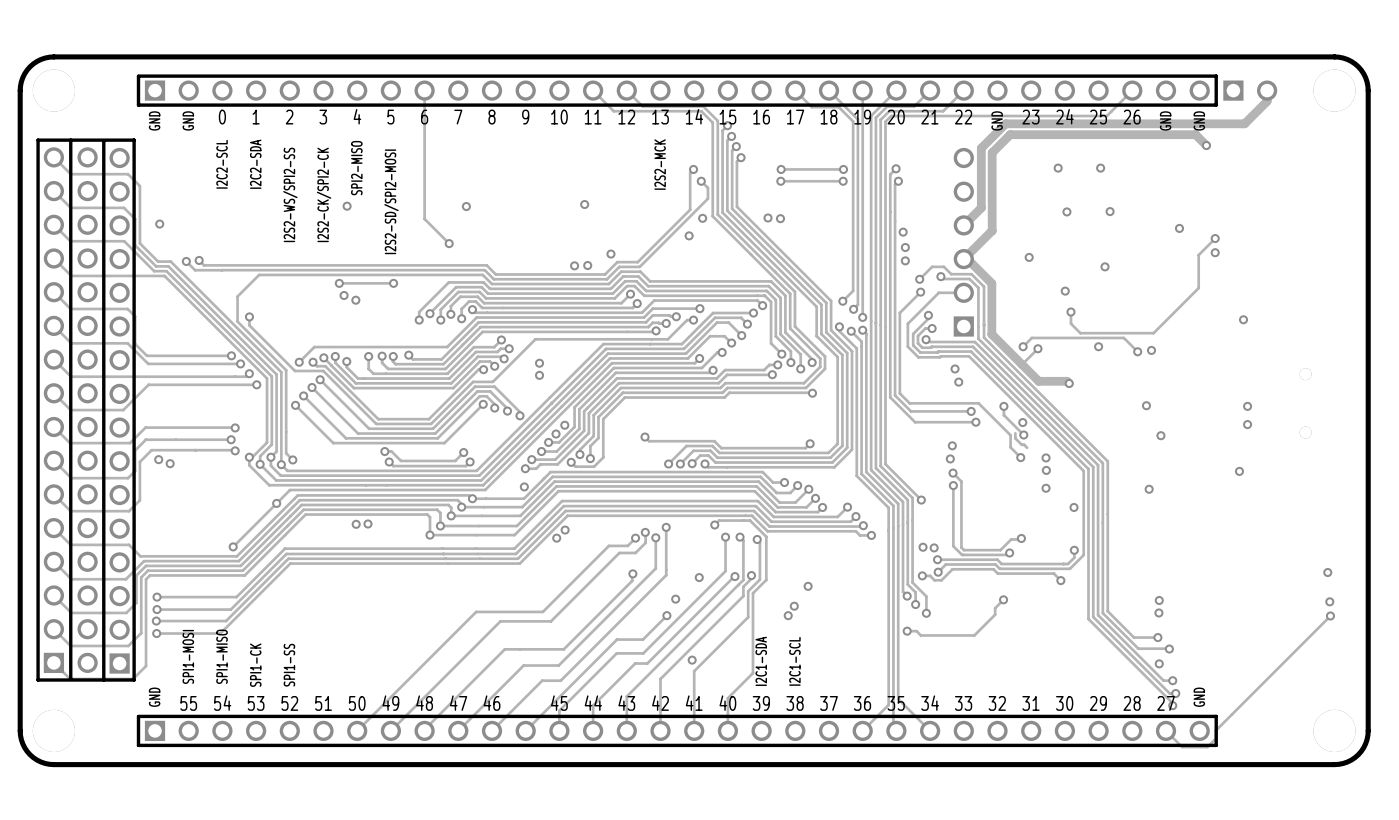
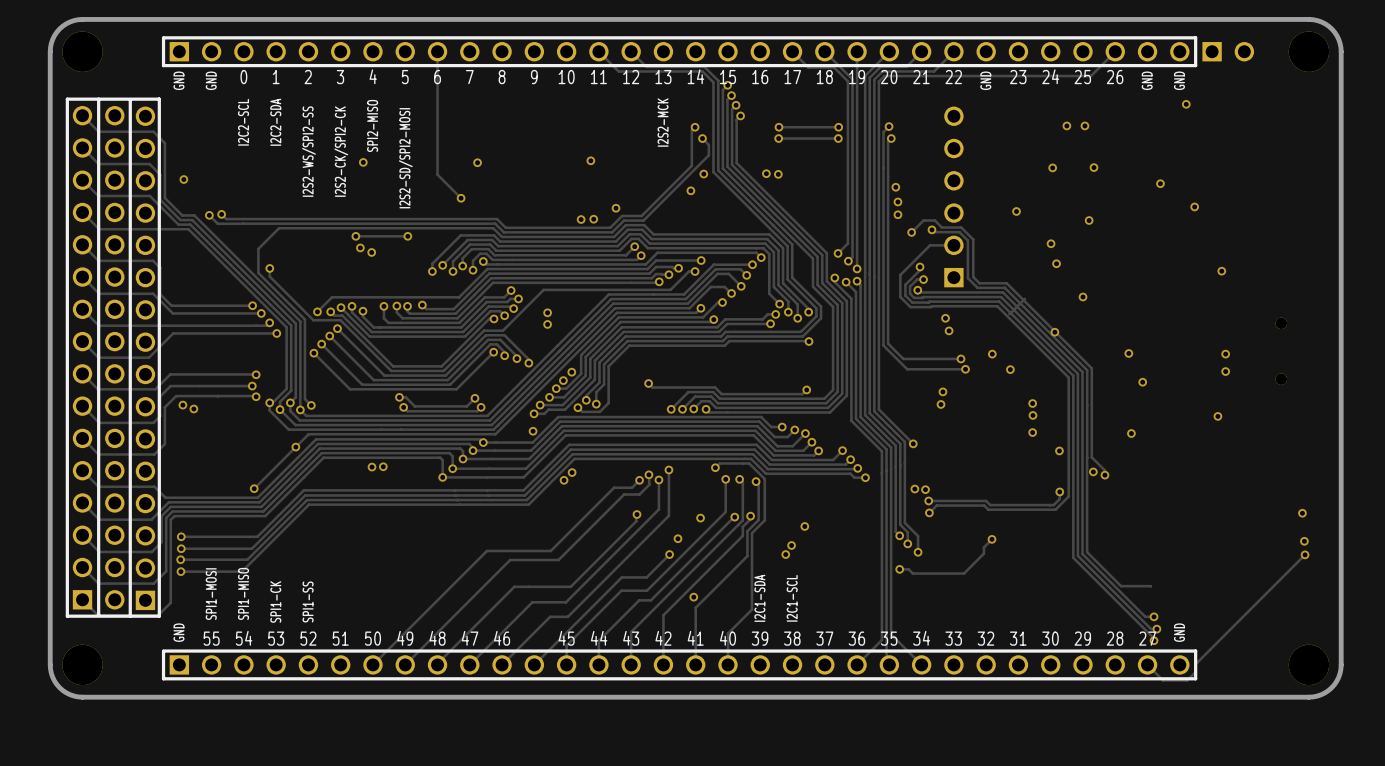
track: (1267, 90) (1267, 101) (1244, 123) (1005, 123) (981, 148) (981, 207) (963, 225) -> none
track: (1206, 145) (1195, 134) (1010, 134) (992, 152) (992, 230) (963, 259) (967, 259) (991, 283) (991, 334) (1038, 381) (1067, 381) (1069, 383) -> none
via position: (1058, 168) -> (1066, 125)
track: (1215, 238) (1198, 255) (1198, 288) (1153, 333) (1080, 333) (1070, 323) (1070, 312) -> none
via: (1215, 238) -> none
track: (920, 292) (899, 312) (899, 393) (909, 403) (978, 403) (1010, 435) (1010, 447) (1020, 457) -> none
via: (920, 292) -> none
track: (984, 325) (984, 337) (1107, 461) -> (973, 277) (979, 283) (1006, 283) (1091, 368) (1091, 406)
track: (978, 327) (978, 338) (1102, 463) (1102, 514) -> (967, 278) (977, 287) (1004, 287) (1087, 370) (1087, 457)
track: (974, 342) (1098, 465) -> (964, 292) (1002, 292) (1082, 372) (1082, 410)
track: (972, 346) (1093, 467) -> (962, 297) (1001, 297) (1077, 373) (1077, 412)
track: (1023, 346) (1031, 337) (1123, 337) (1137, 351) -> none
via: (1023, 346) -> none
via: (1037, 348) -> none
via: (1151, 350) -> none
track: (971, 351) (1088, 469) -> (960, 301) (999, 301) (1073, 375) (1073, 414)
via: (1137, 351) -> none
track: (969, 356) (1083, 471) -> (958, 306) (997, 306) (1068, 377) (1068, 416)
track: (1003, 406) (1003, 415) (1023, 435) -> none
track: (1015, 433) (1015, 438) (1027, 447) -> none
via: (1023, 435) -> none
via: (1020, 457) -> none
track: (953, 473) (961, 481) (961, 547) (964, 550) (1000, 550) (1011, 539) (1021, 538) -> none
via: (953, 473) -> none
track: (953, 485) (953, 546) (962, 554) (1007, 554) (1009, 552) -> none
via: (953, 485) -> none
track: (1107, 514) (1107, 611) (1133, 637) (1157, 637) -> (1091, 457) (1104, 470) (1104, 475)
via: none -> (1093, 471)
via: none -> (1104, 475)
via: (1021, 538) -> none
via: (1009, 552) -> none
track: (922, 575) (930, 575) (934, 580) (941, 580) (952, 569) (993, 569) (997, 573) (1053, 573) (1060, 580) -> none
via: (922, 575) -> none
via: (1060, 580) -> none
via: (1159, 600) -> none
via: (1158, 612) -> none
via: (1157, 637) -> none
via: (1169, 649) -> none
via: (1159, 663) -> none

